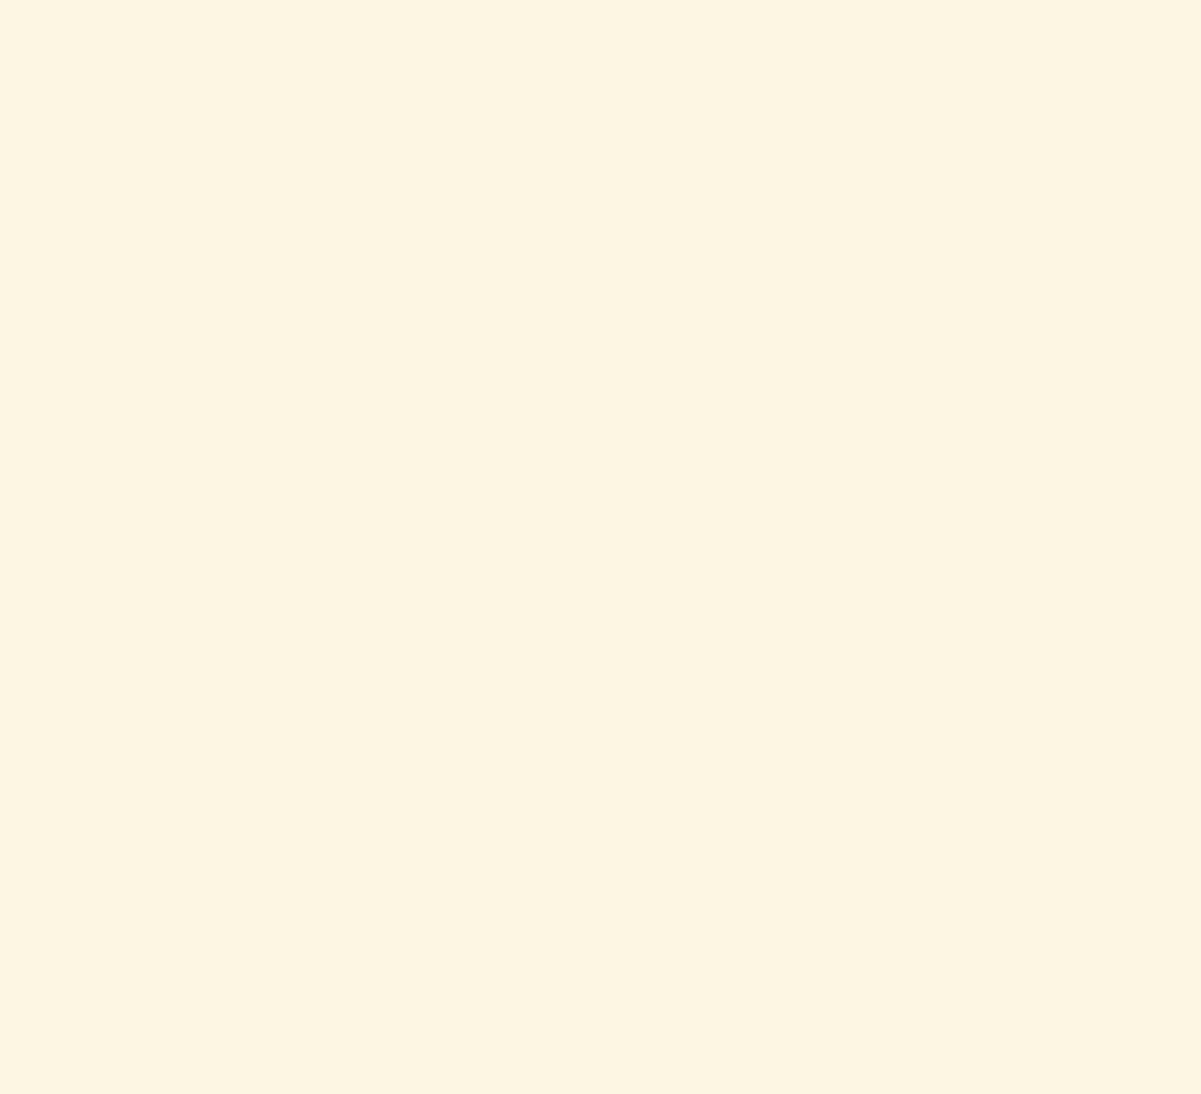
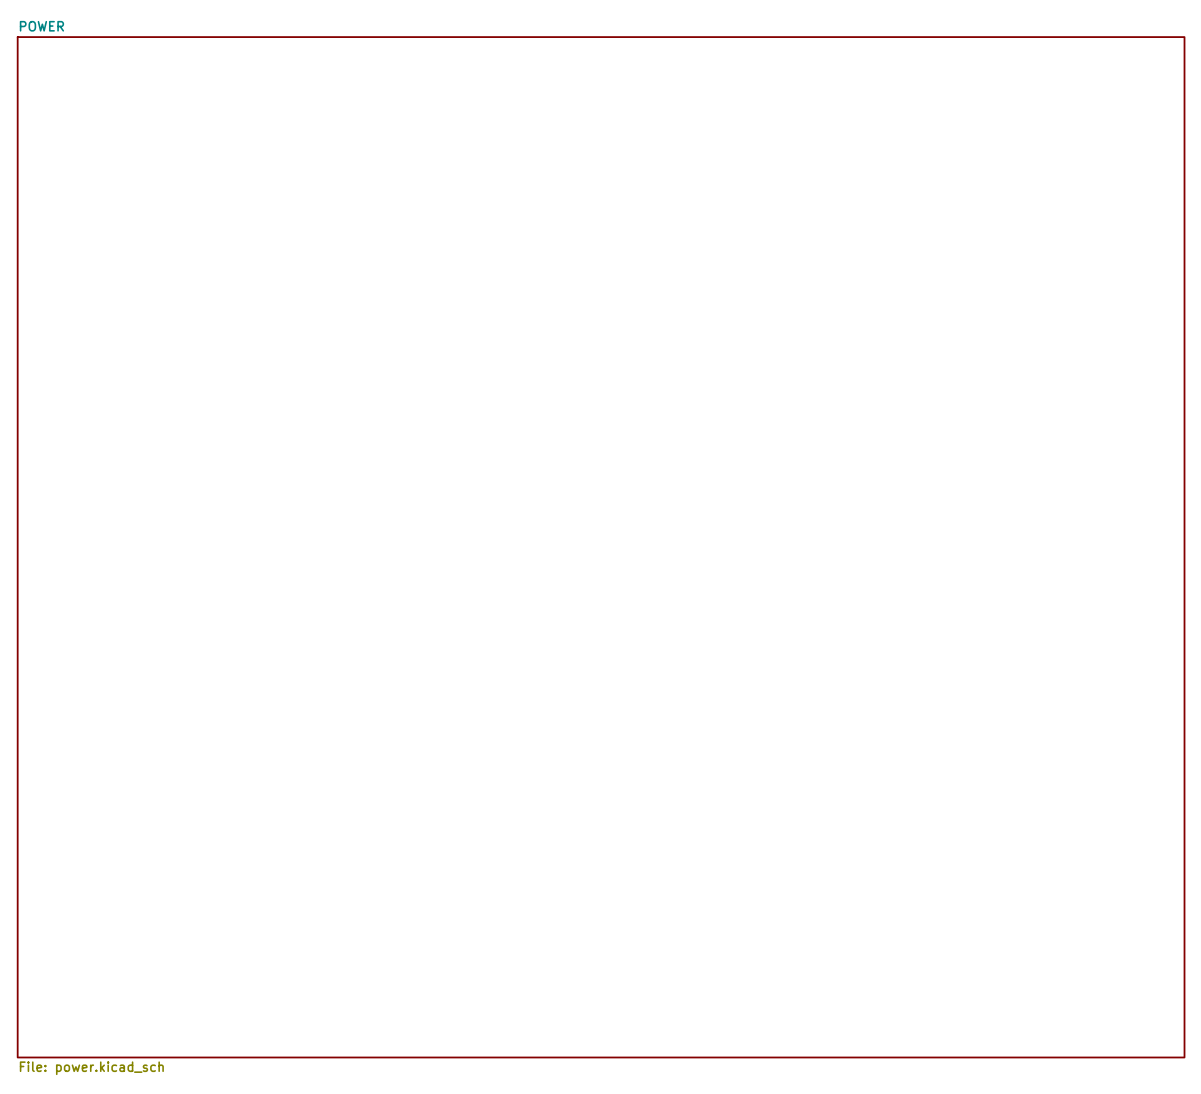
sheet POWER: none -> File: power.kicad_sch (601, 547)

